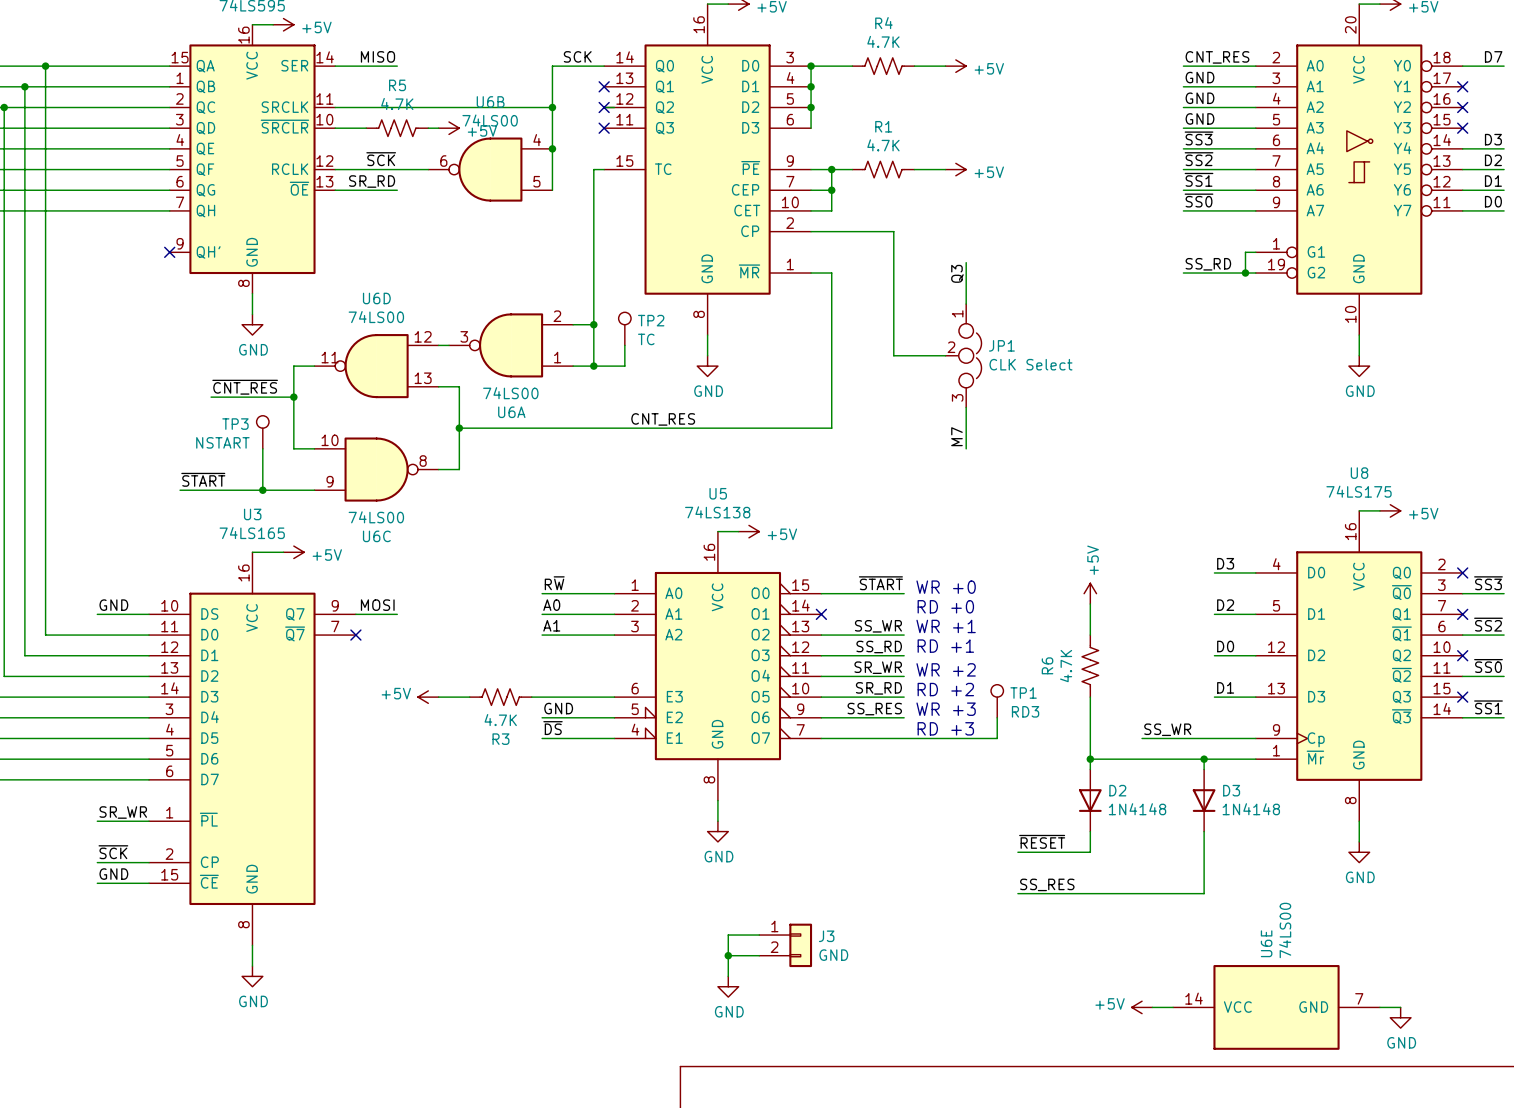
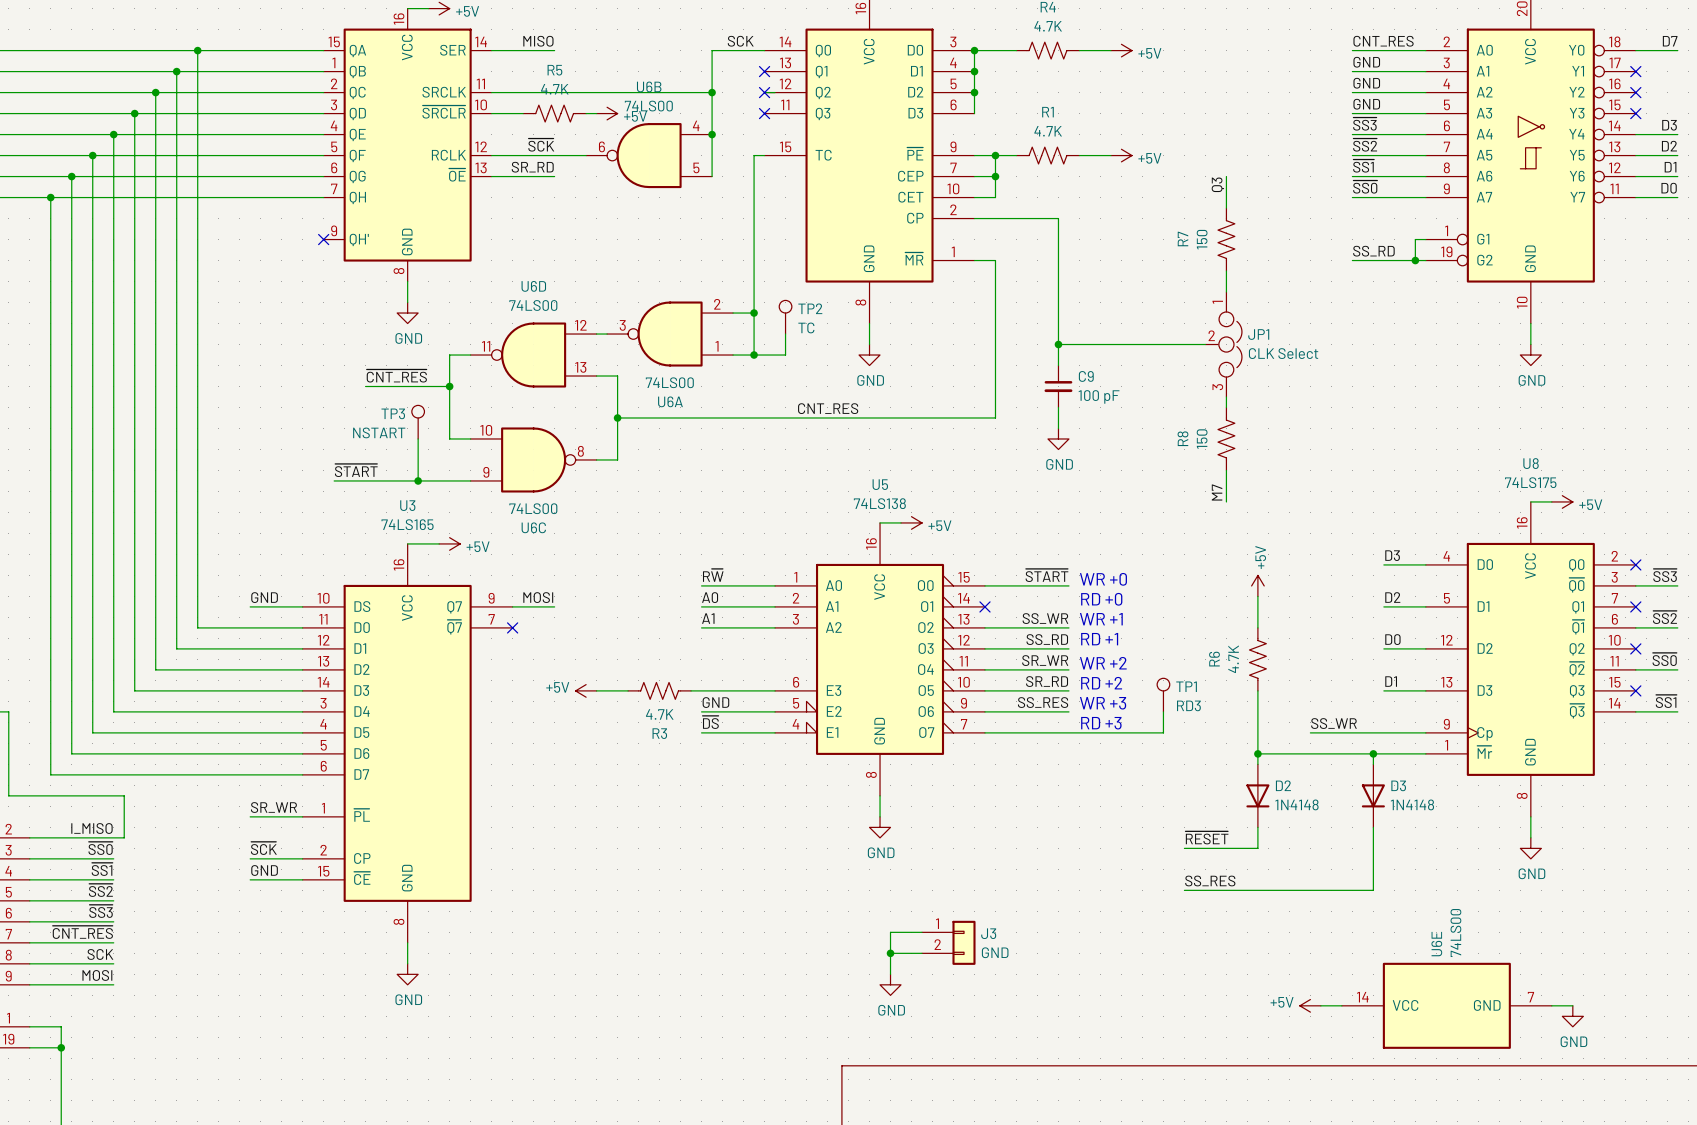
wire: none -> (1226, 176) (1226, 208)
R7: none -> 150 (1226, 239)
wire: (966, 262) (966, 304) -> none
label position: Q3 (957, 273) -> Q3 (1217, 184)
wire: none -> (1226, 271) (1226, 292)
wire: none -> (1058, 344) (1058, 365)
junction: none -> (1058, 344)
wire: none -> (1110, 344) (1205, 344)
JP1 position: (963, 355) -> (1223, 344)
C9: none -> 100 pF (1058, 386)
wire: (966, 407) (966, 448) -> none
wire: none -> (1226, 397) (1226, 407)
wire: none -> (1058, 407) (1058, 428)
label position: M7 (956, 436) -> M7 (1217, 492)
power symbol: none -> GND (1058, 438)
R8: none -> 150 (1226, 438)
wire: none -> (1226, 470) (1226, 501)

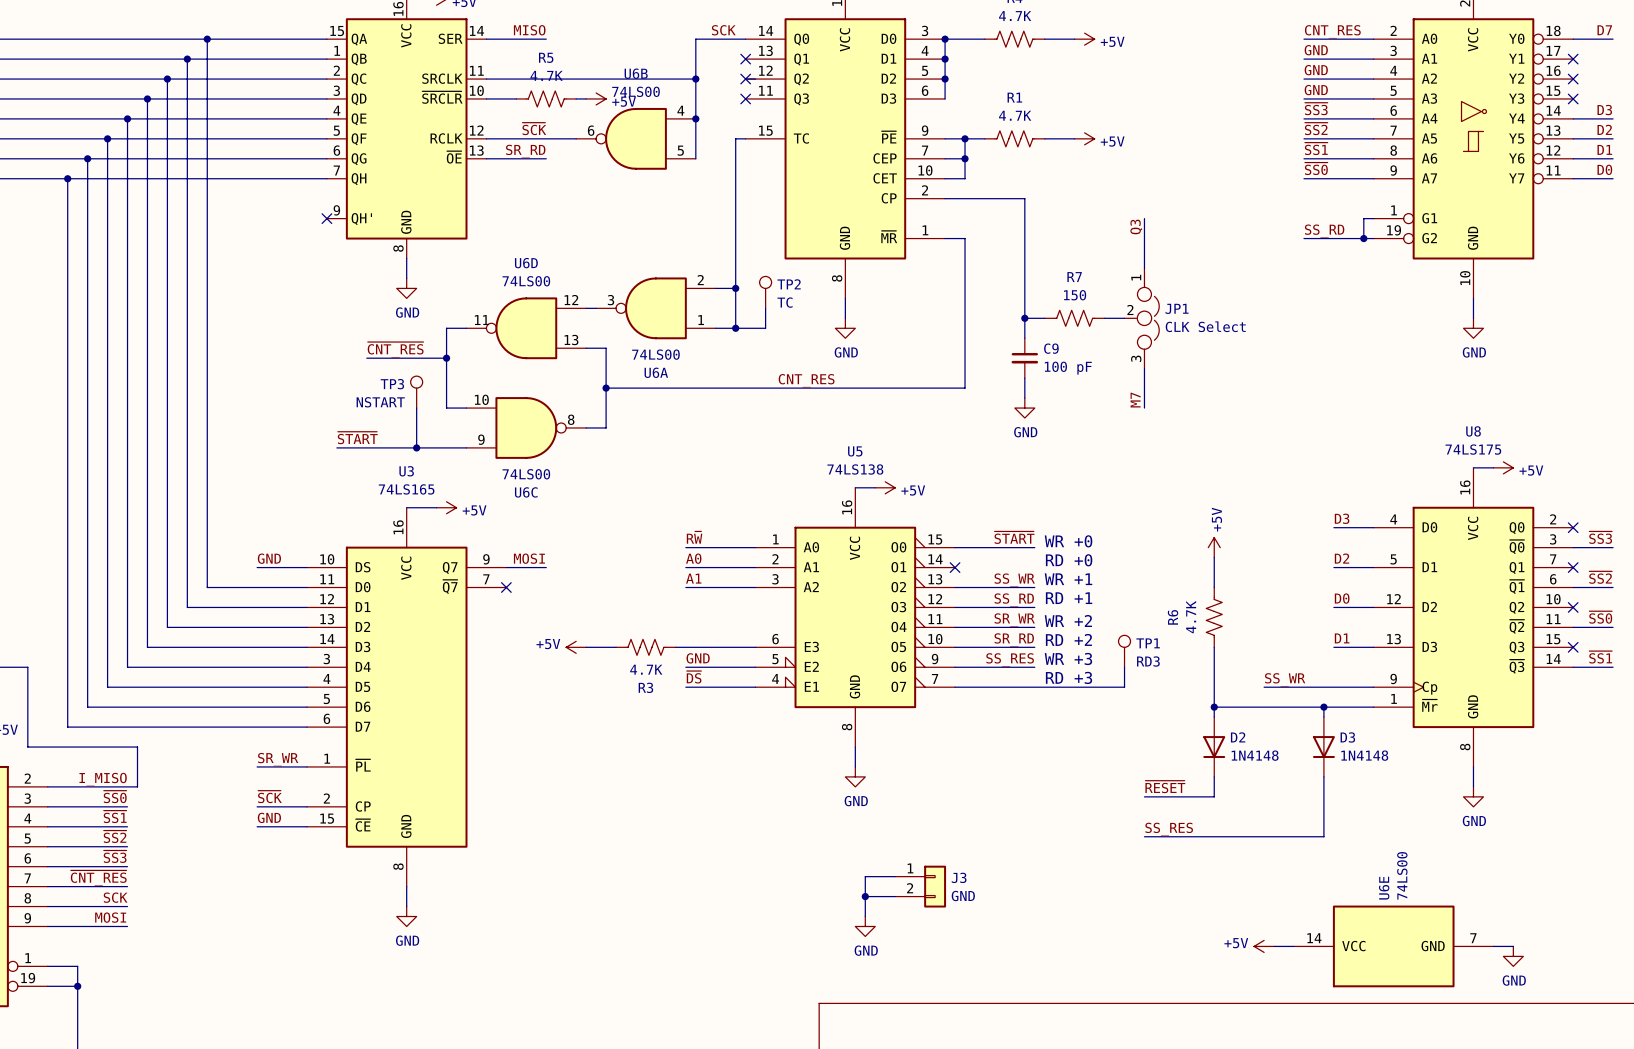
wire: (1226, 176) (1226, 208) -> none
label position: Q3 (1217, 184) -> Q3 (1136, 226)
wire: none -> (1144, 218) (1144, 268)
R7 rotation: 0° (1226, 239) -> 90° clockwise (1074, 318)
R7 position: (1226, 239) -> (1074, 318)
wire: (1226, 271) (1226, 292) -> none
wire: (1163, 344) (1205, 344) -> none
JP1 position: (1223, 344) -> (1141, 318)
wire: none -> (1144, 368) (1144, 408)
wire: (1226, 397) (1226, 407) -> none
R8: 150 (1226, 438) -> none
wire: (1226, 470) (1226, 501) -> none
label position: M7 (1217, 492) -> M7 (1135, 400)

